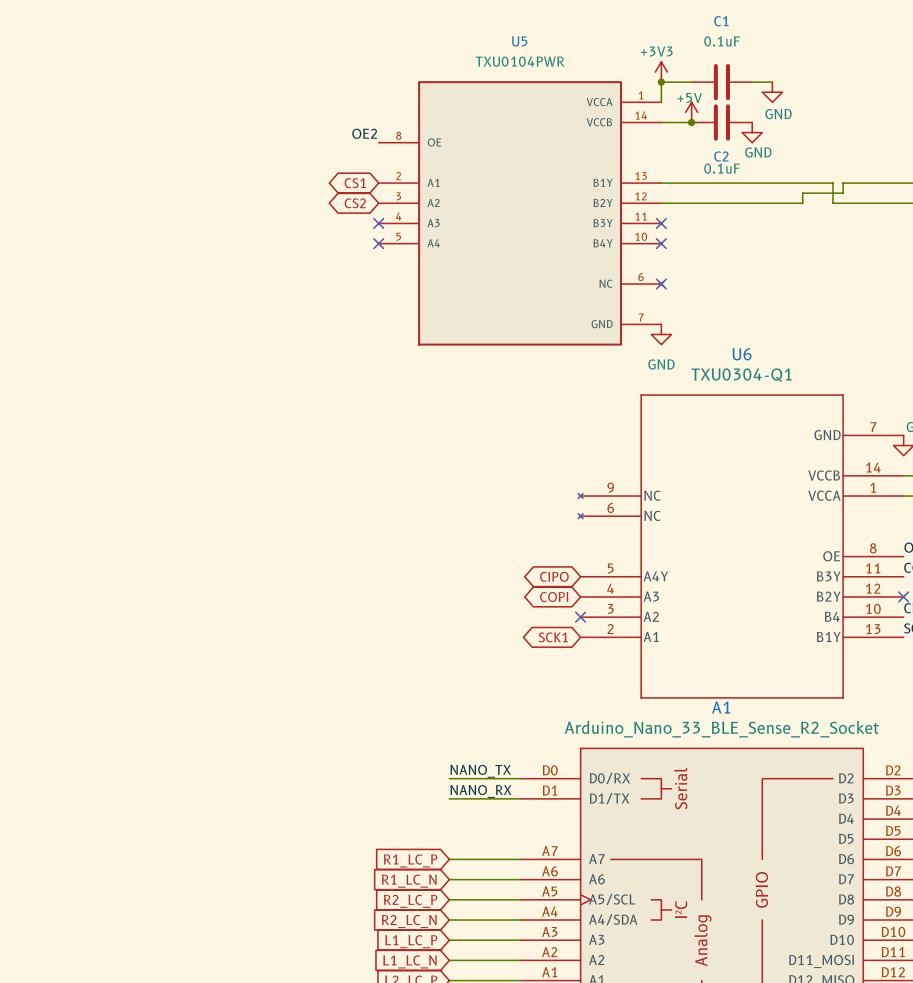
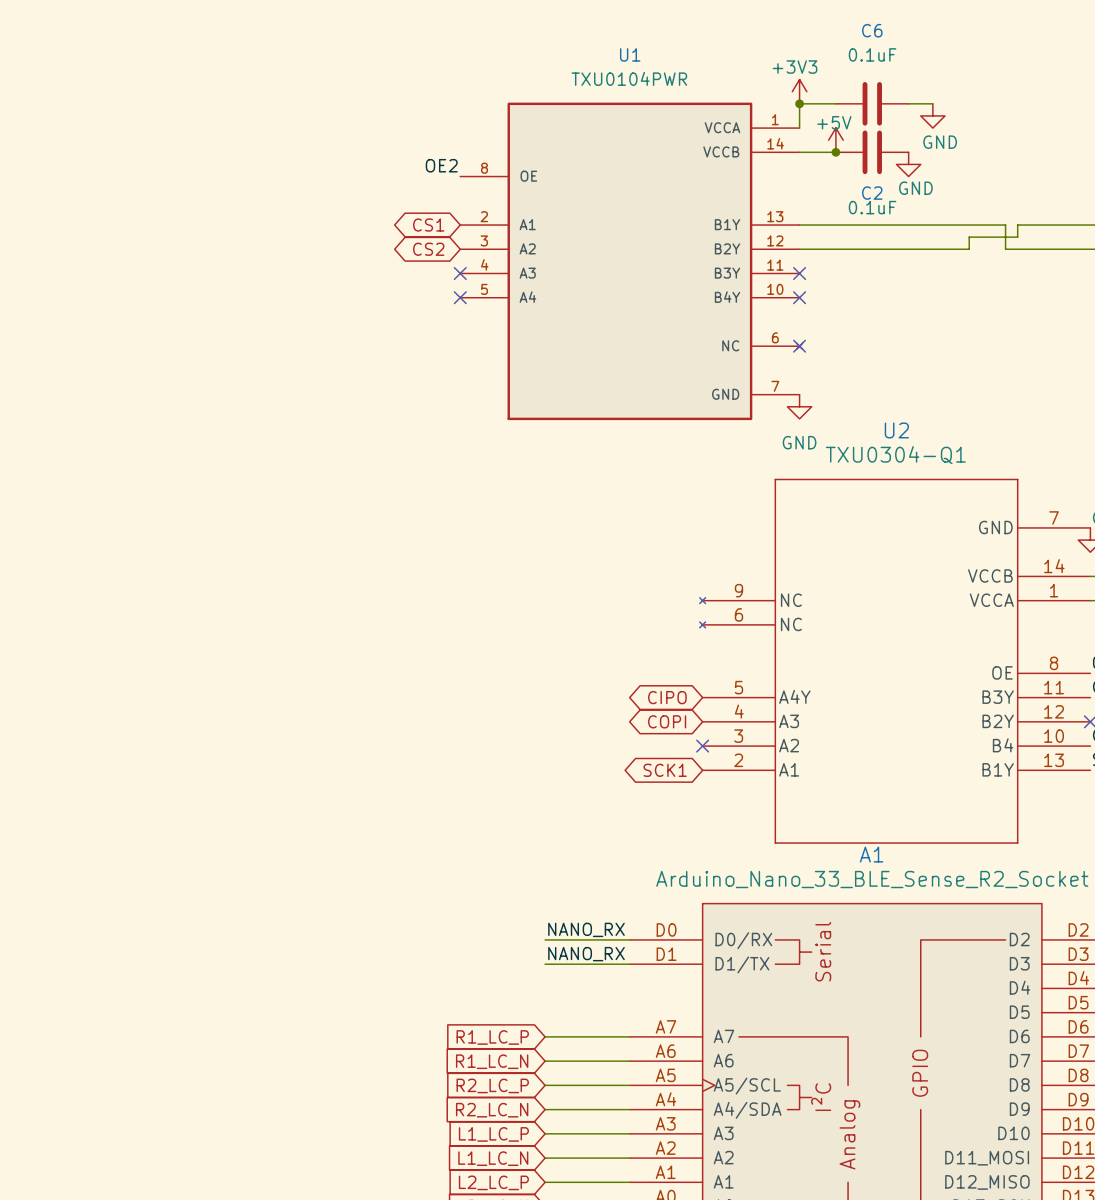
C1 name: C1 (721, 21) -> C6 (872, 30)
U5 name: U5 (519, 41) -> U1 (630, 54)
U6 name: U6 (742, 354) -> U2 (896, 430)
label: NANO_TX (480, 771) -> NANO_RX (586, 929)

